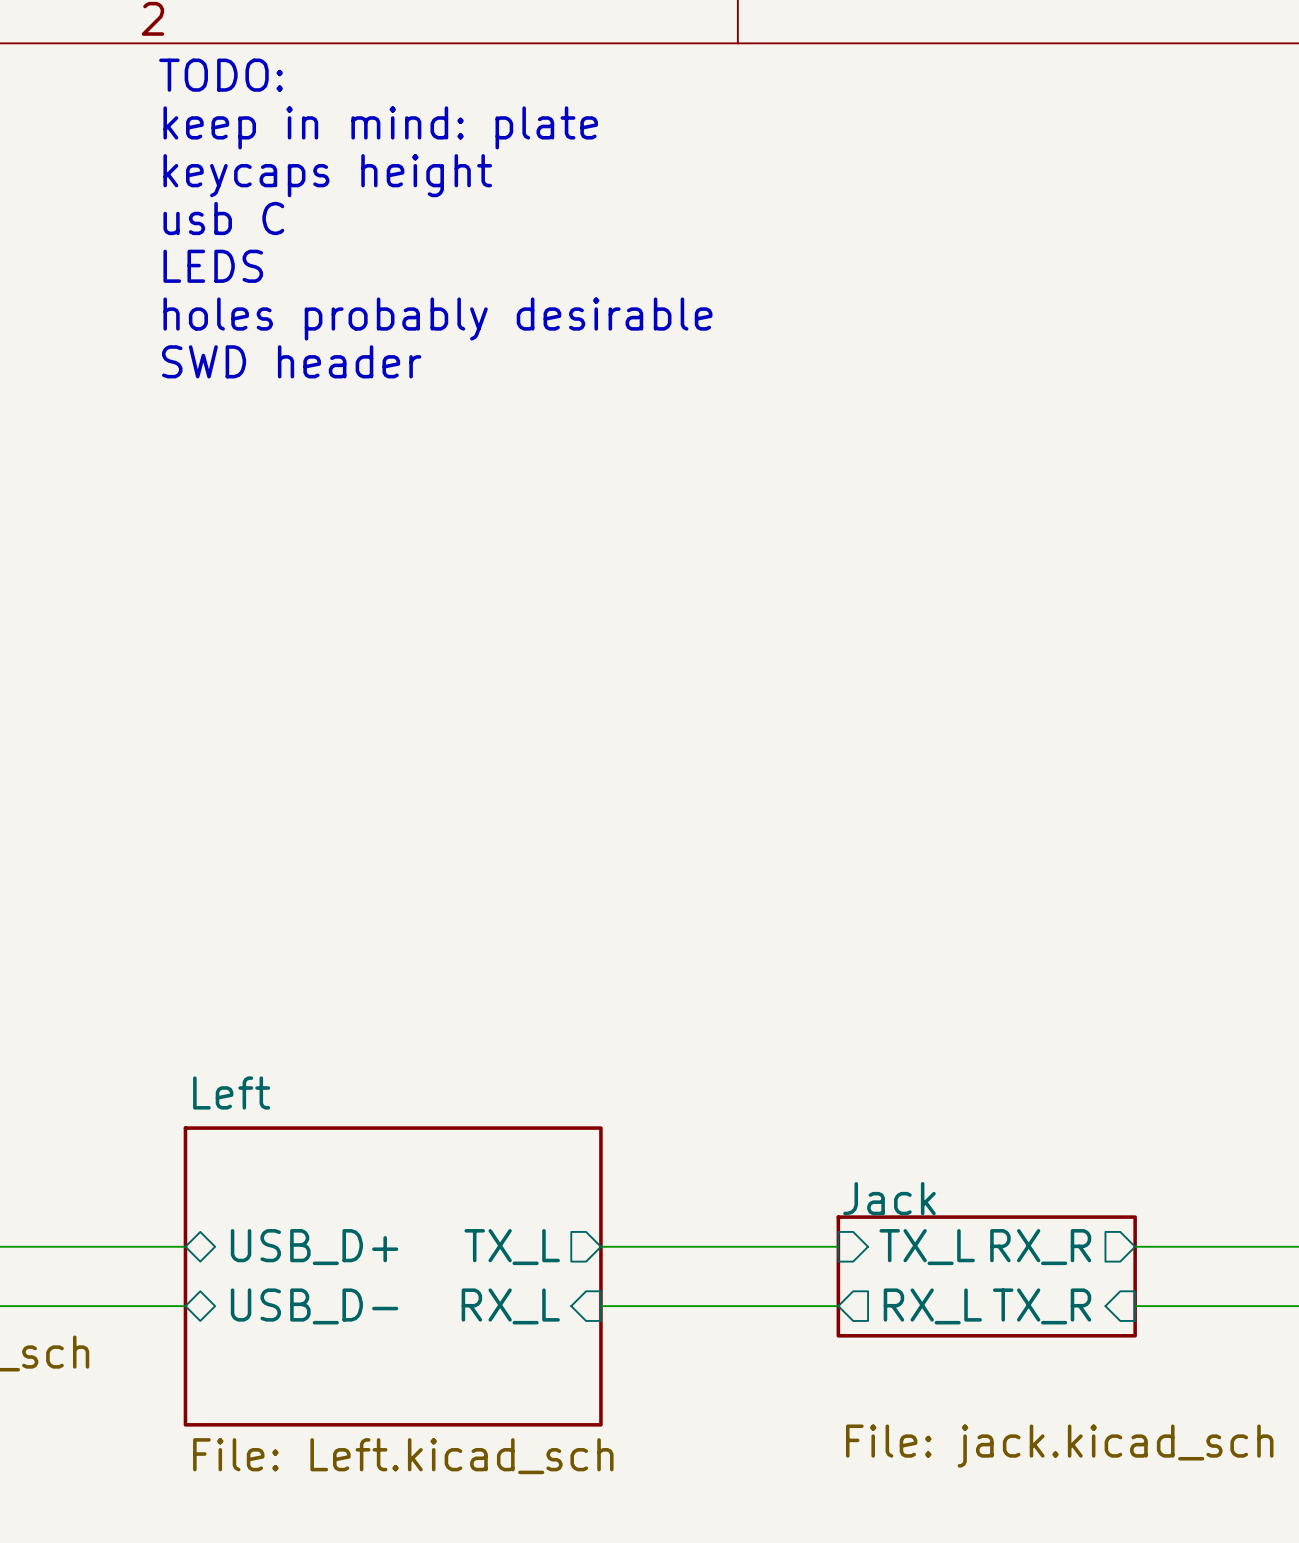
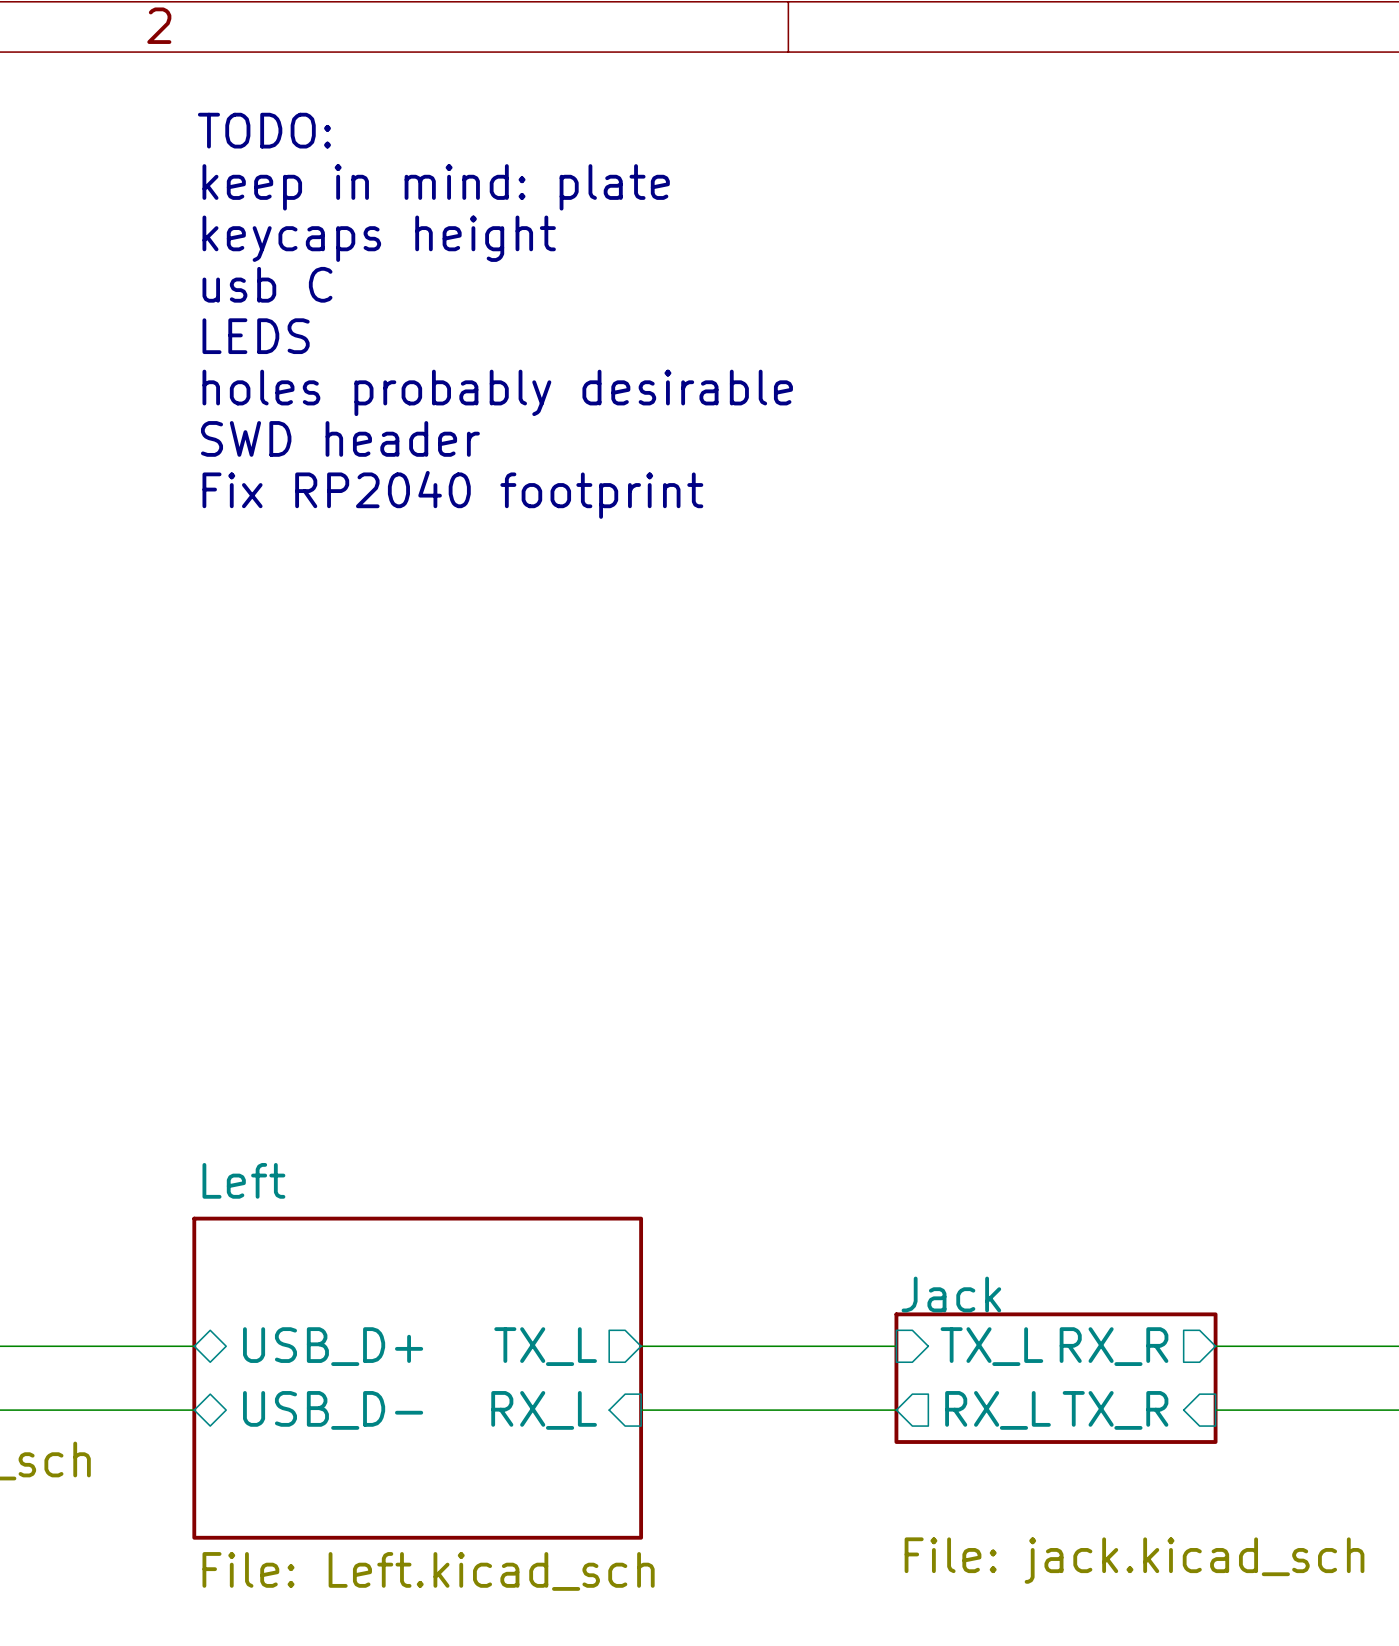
text position: TODO: (221, 75) -> TODO: (264, 130)
text position: keep in mind: plate (380, 127) -> keep in mind: plate (436, 187)
text position: keycaps height (327, 175) -> keycaps height (379, 238)
text position: usb C (223, 218) -> usb C (267, 284)
text position: LEDS (213, 266) -> LEDS (256, 336)
text position: holes probably desirable (437, 319) -> holes probably desirable (497, 392)
text position: SWD header (291, 361) -> SWD header (340, 438)
text: none -> Fix RP2040 footprint (452, 494)

